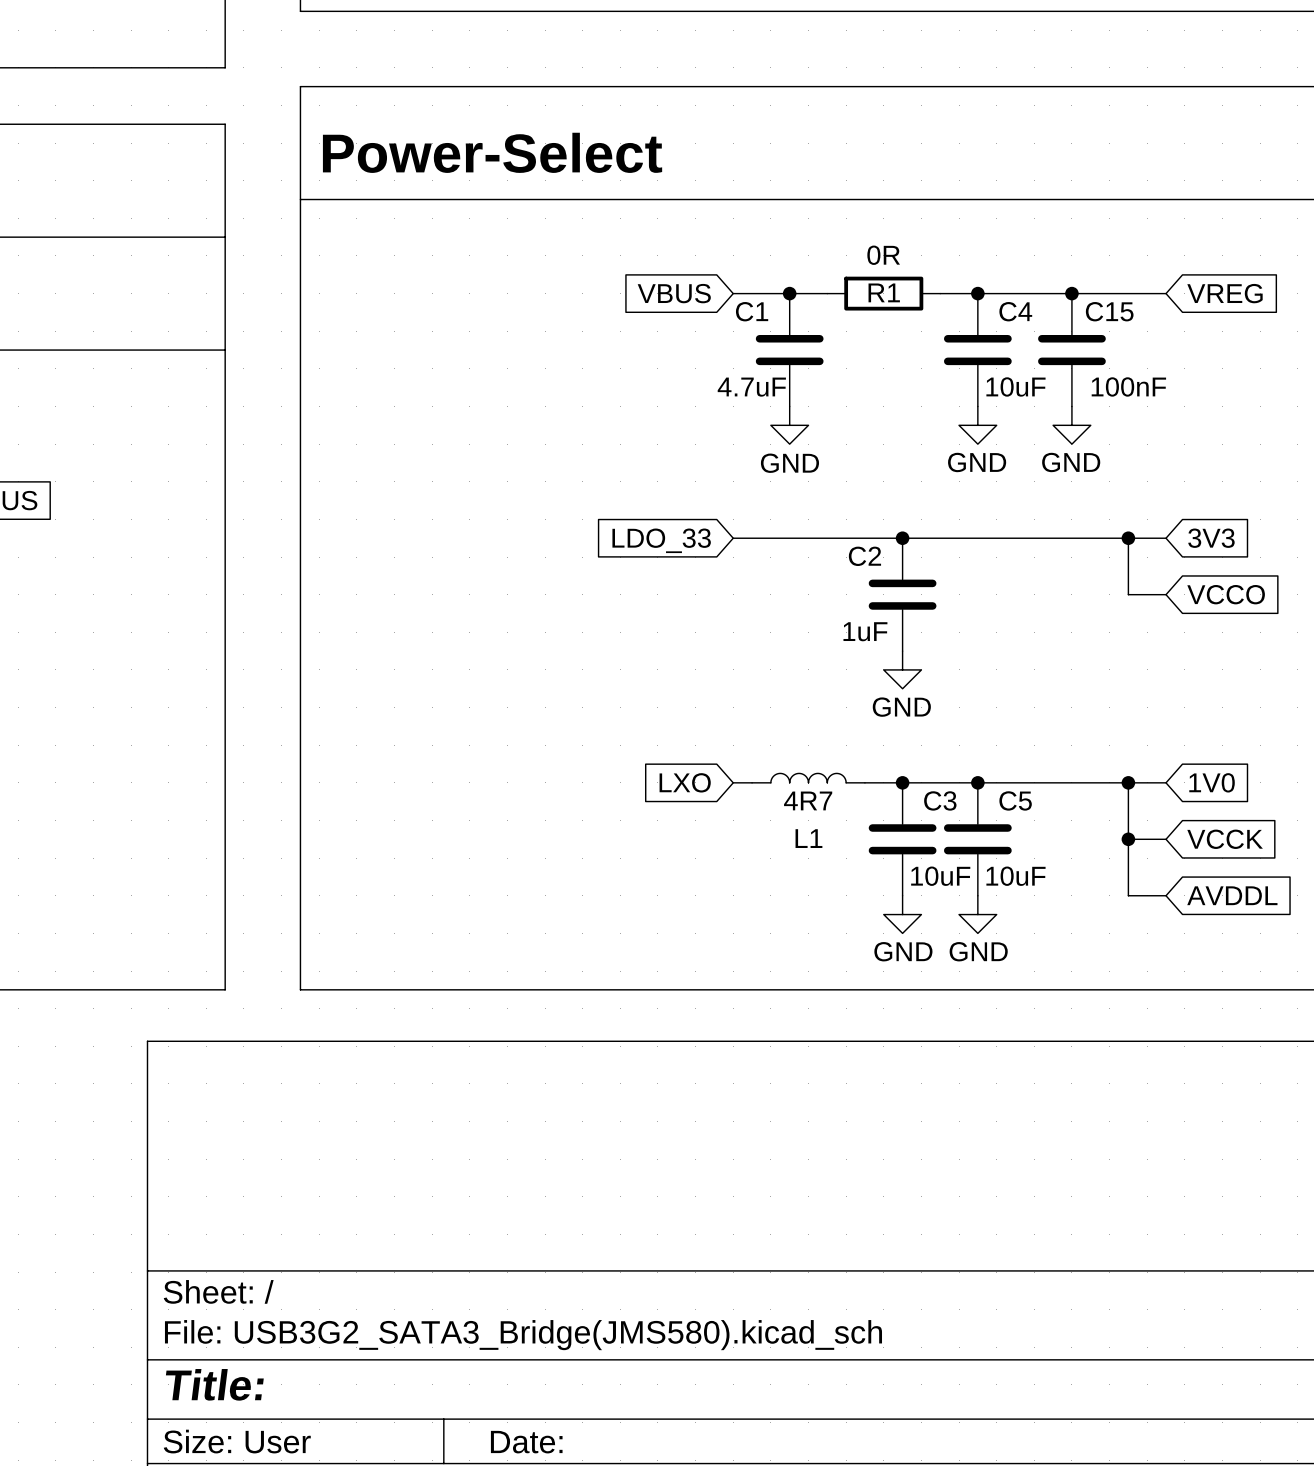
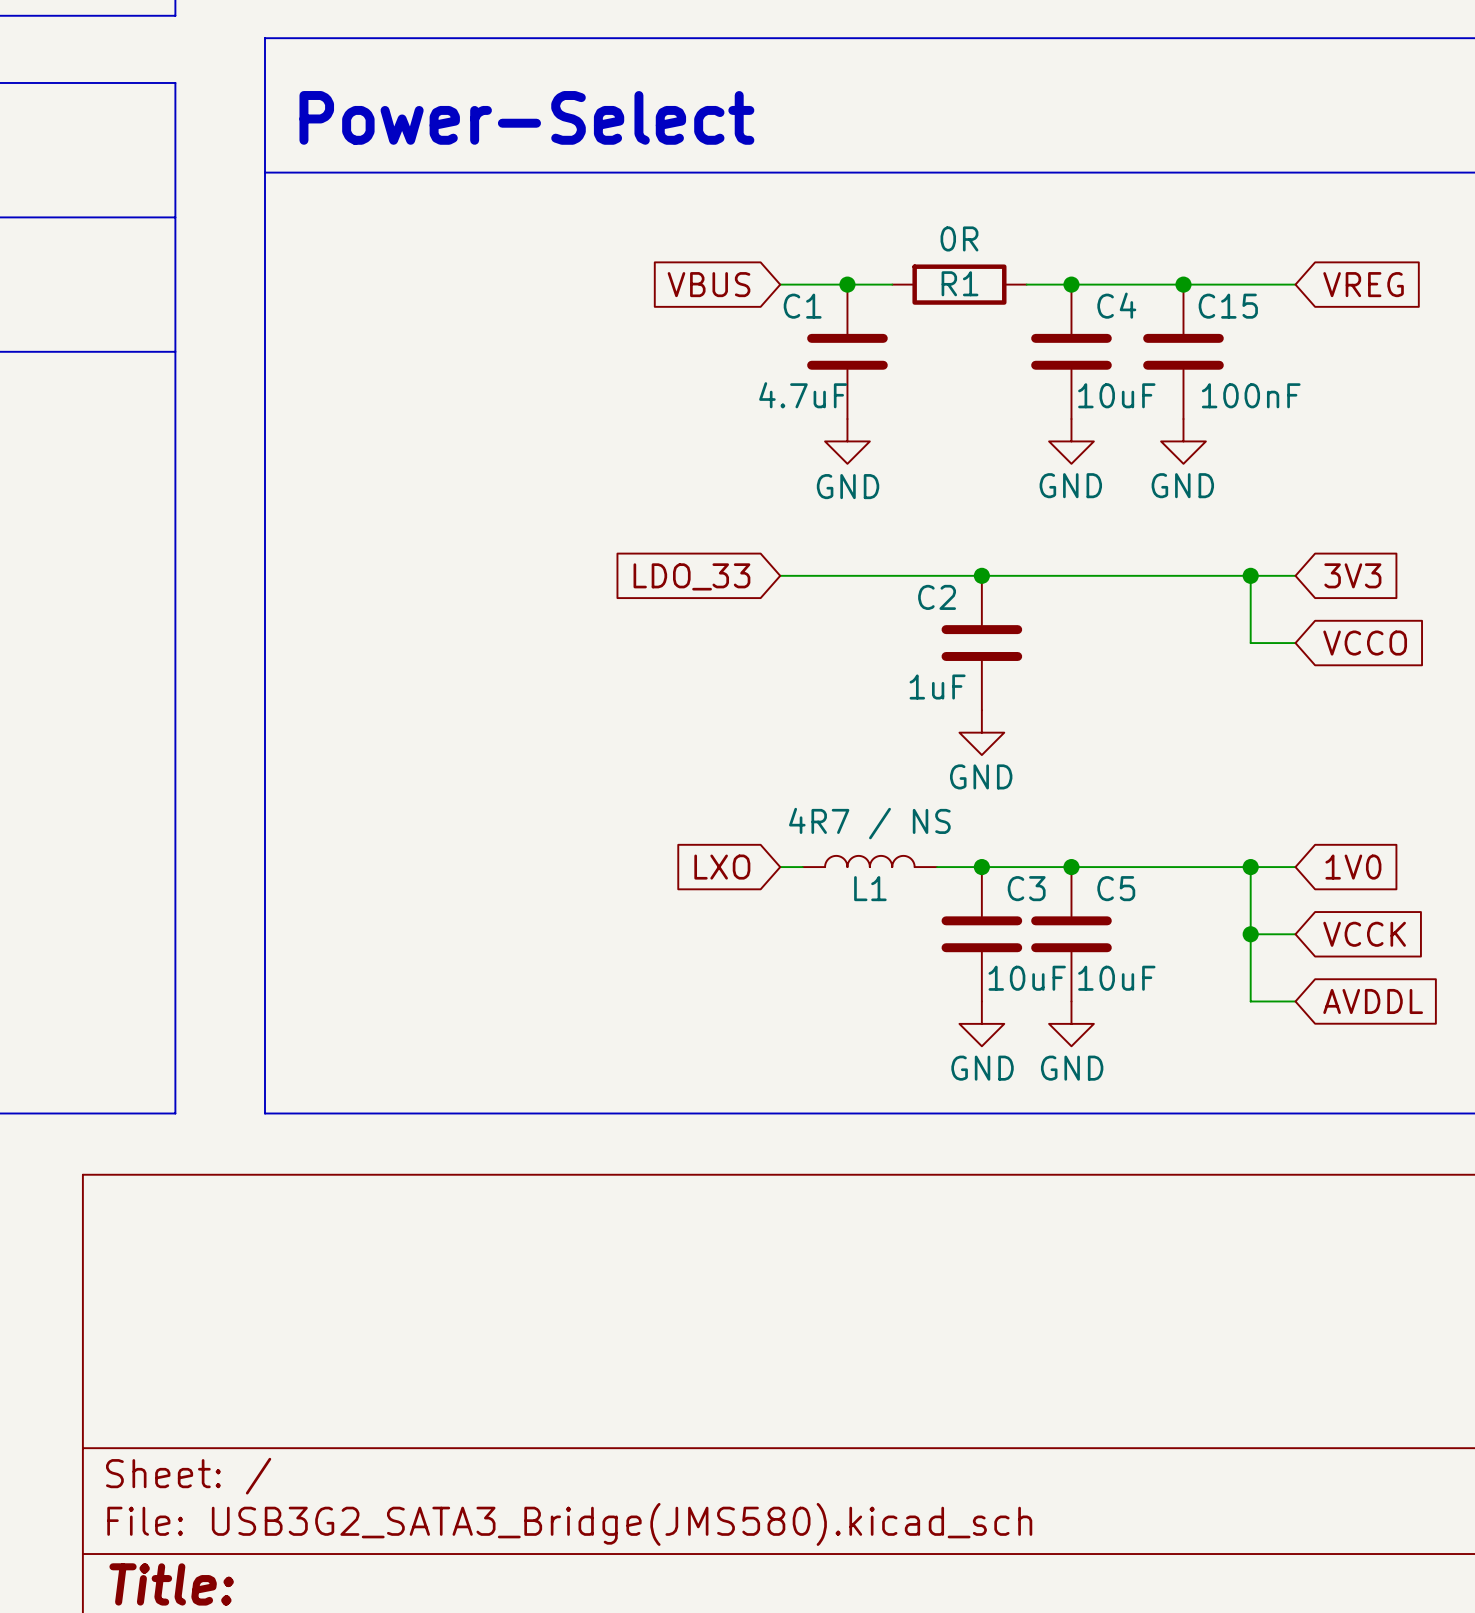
L1 value: 4R7 (808, 800) -> 4R7 / NS (869, 823)
L1 name position: L1 (808, 838) -> L1 (870, 888)

